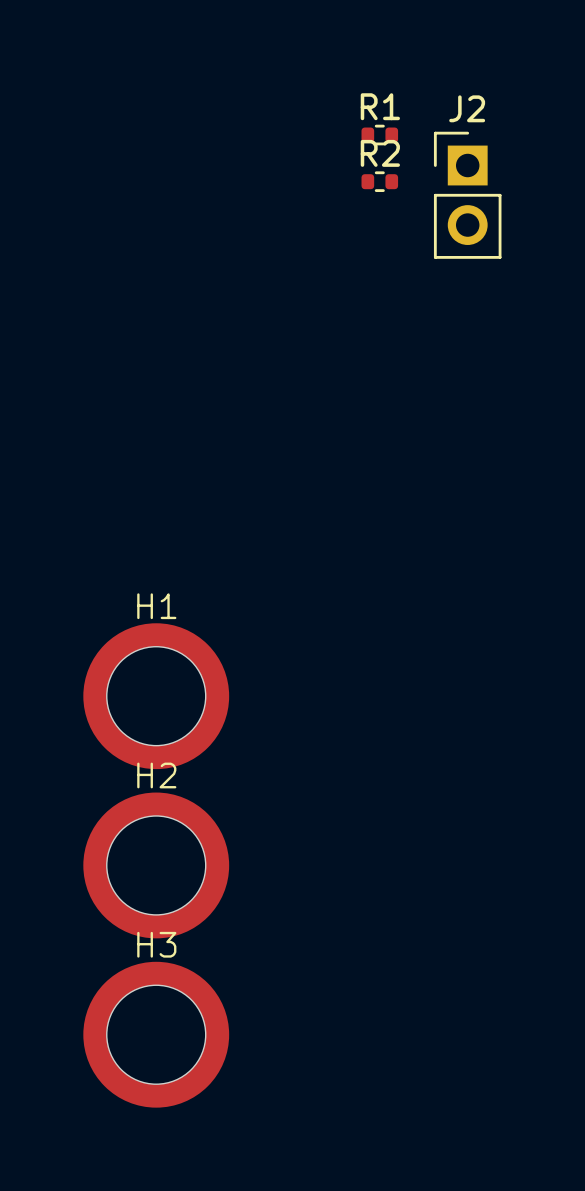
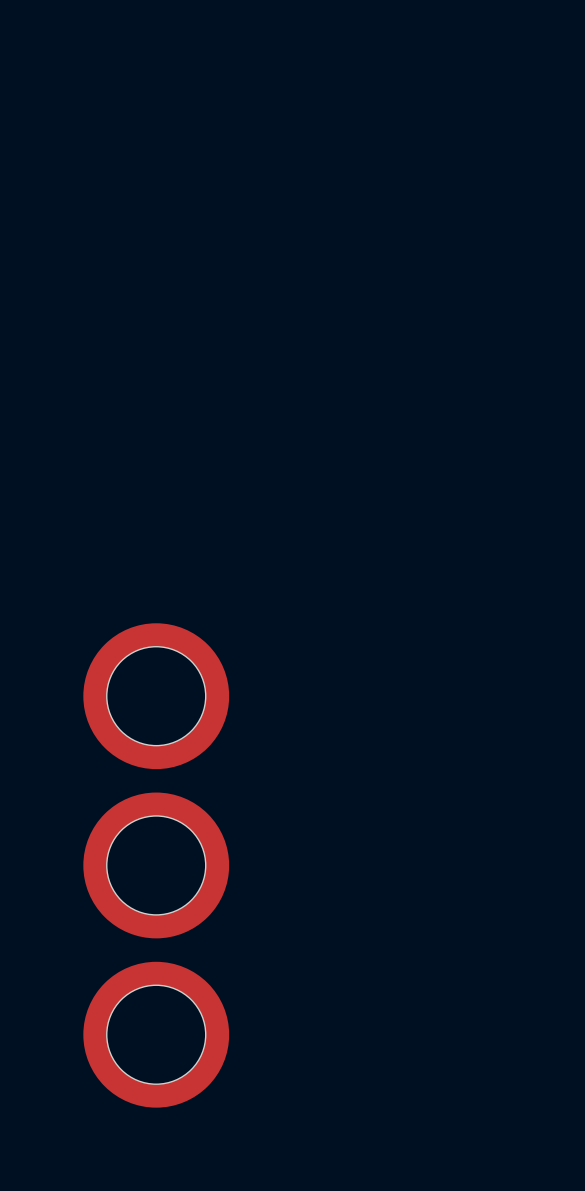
R1: (379, 135) -> none
R2: (379, 181) -> none
J2: (467, 195) -> none
H1 name: H1 (156, 606) -> none
H2 name: H2 (156, 775) -> none
H3 name: H3 (156, 944) -> none

